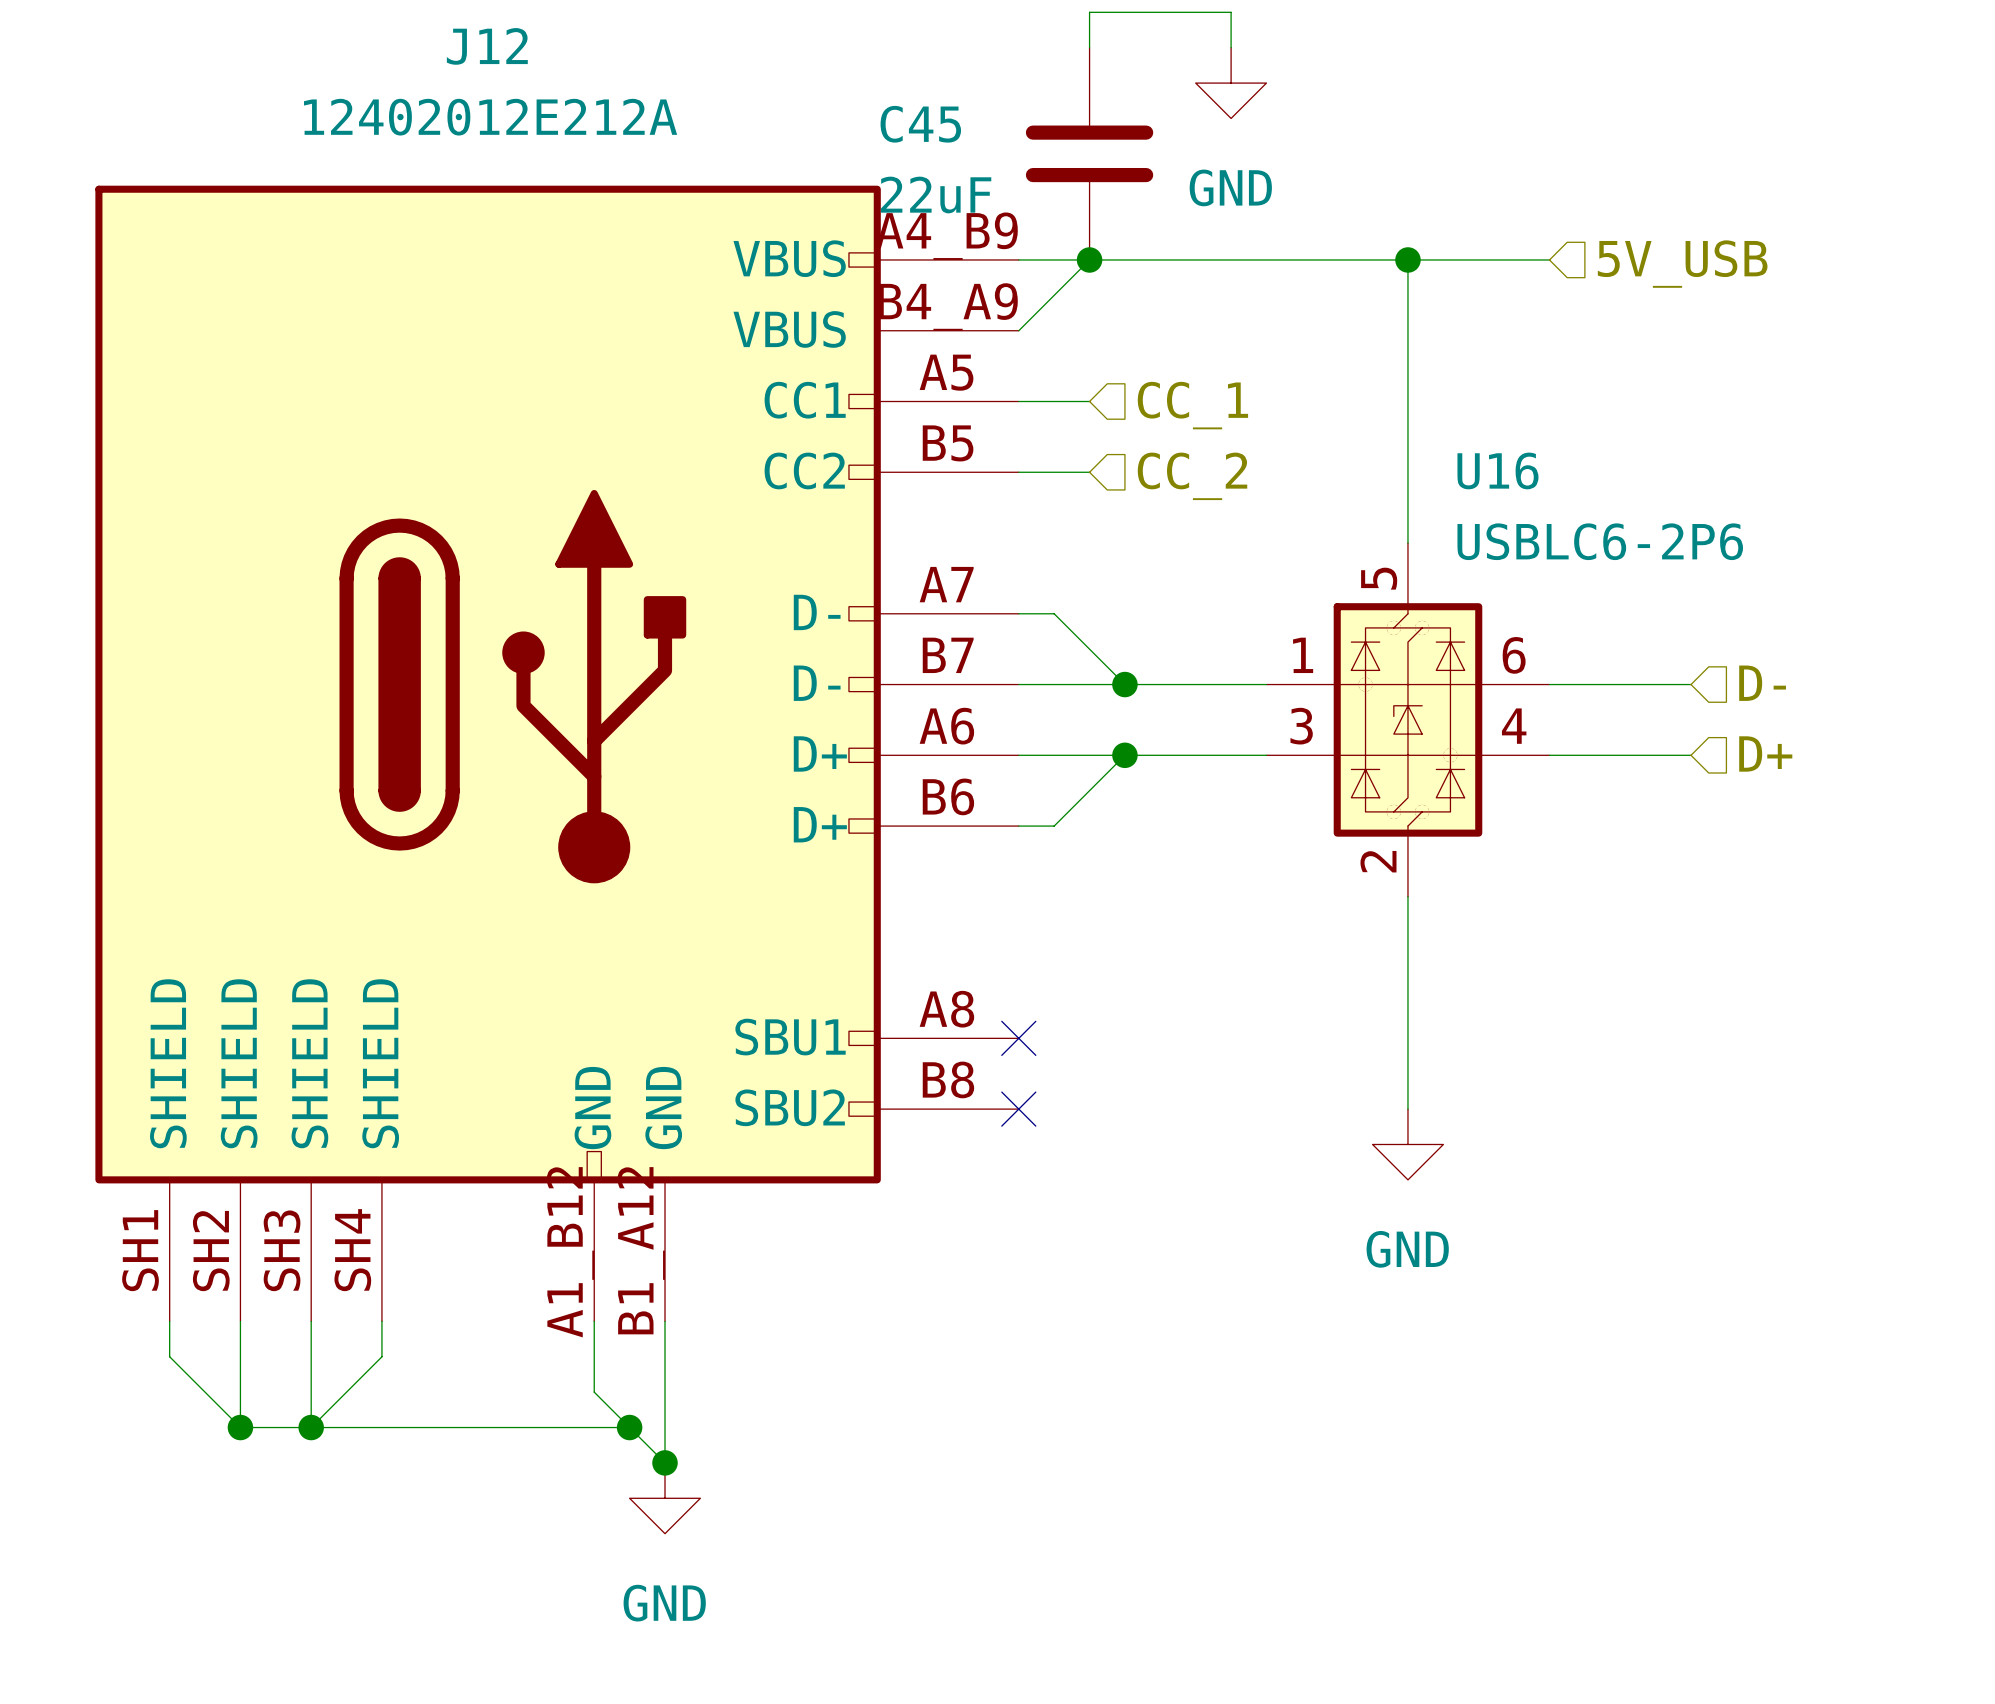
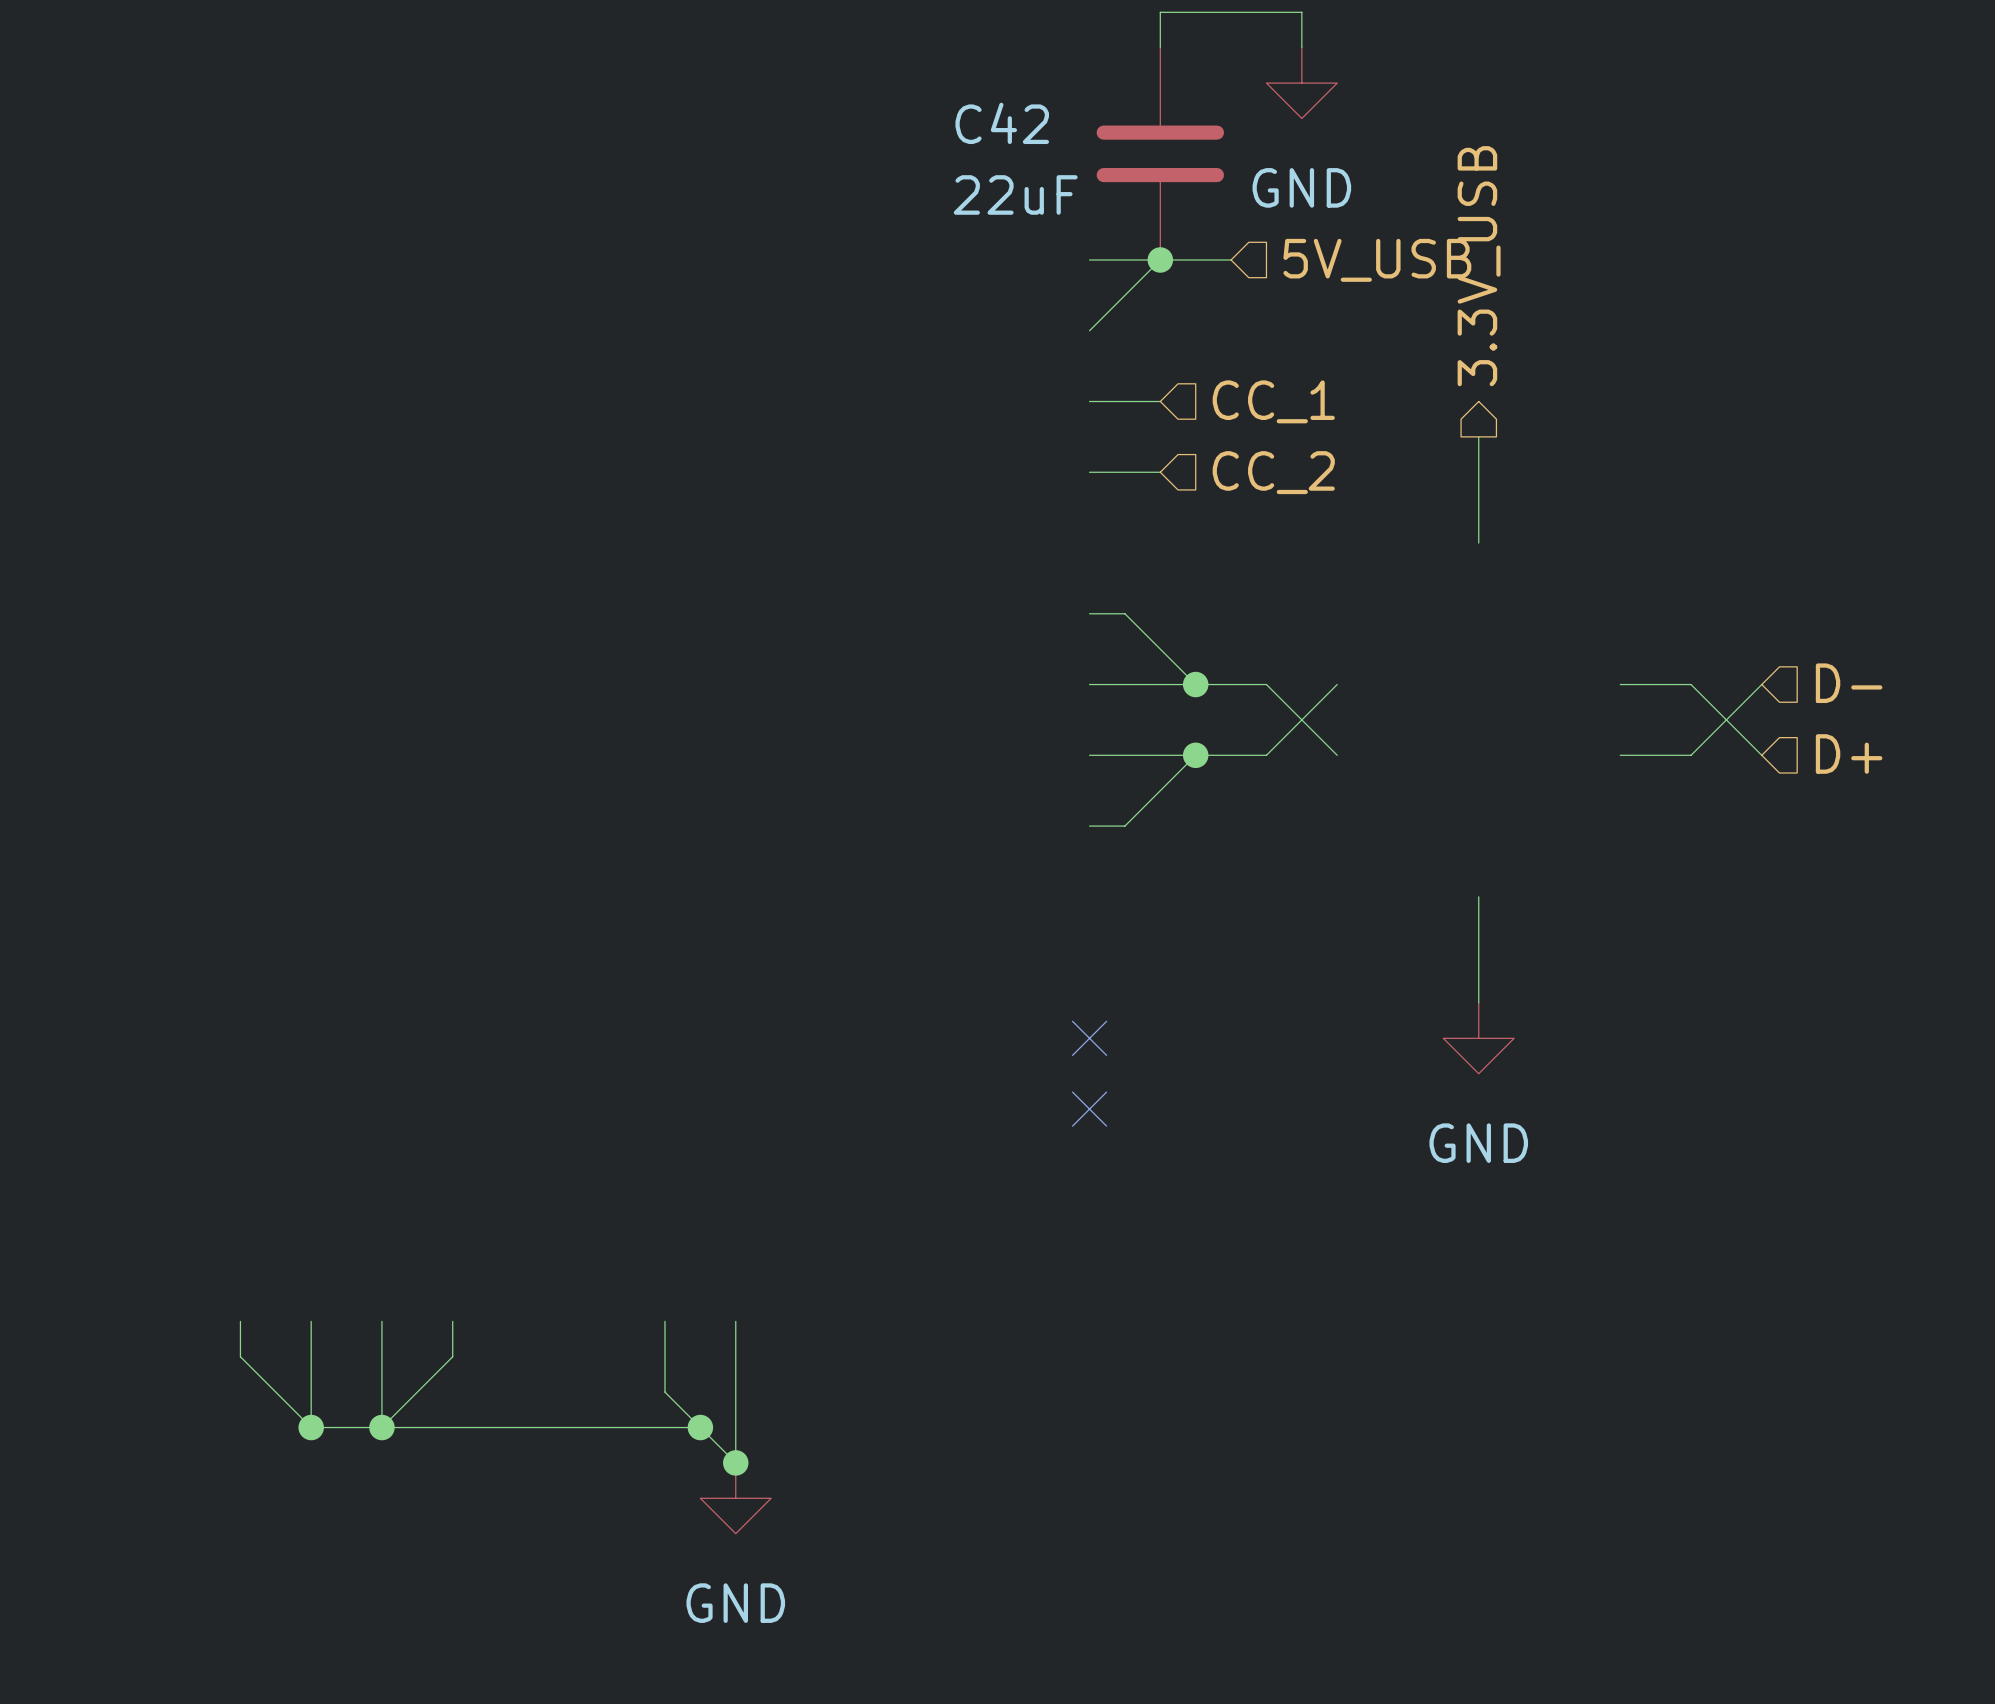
wire: (1160, 12) (1089, 12) (1089, 47) -> (1160, 12) (1160, 47)
wire: (1231, 12) (1231, 47) -> (1231, 12) (1301, 12) (1301, 47)
power symbol position: GND (1231, 83) -> GND (1301, 83)
C45: 22uF (1089, 153) -> none
C42: none -> 22uF (1160, 153)
wire: (1018, 259) (1089, 259) (1018, 330) -> none
junction position: (1089, 259) -> (1160, 259)
wire: none -> (1160, 259) (1089, 330)
wire: (1231, 259) (1549, 259) -> none
wire: (1407, 259) (1407, 543) -> none
junction: (1407, 259) -> none
hierarchical label position: 5V_USB (1682, 264) -> 5V_USB (1377, 260)
hierarchical label: none -> 3.3V_USB (1479, 266)
wire: (1018, 401) (1089, 401) -> (1160, 401) (1089, 401)
hierarchical label position: CC_1 (1192, 405) -> CC_1 (1273, 401)
wire: none -> (1478, 436) (1478, 543)
wire: (1018, 472) (1089, 472) -> (1160, 472) (1089, 472)
hierarchical label position: CC_2 (1192, 476) -> CC_2 (1273, 472)
wire: (1018, 613) (1054, 613) (1124, 684) -> (1089, 613) (1124, 613) (1195, 684)
hierarchical label position: D- (1762, 683) -> D- (1849, 683)
wire: (1018, 684) (1089, 684) -> none
junction: (1124, 684) -> none
junction: none -> (1195, 684)
wire: none -> (1266, 684) (1337, 755)
wire: none -> (1337, 684) (1266, 755)
wire: (1549, 684) (1620, 684) -> none
wire: none -> (1691, 684) (1761, 755)
wire: none -> (1761, 684) (1691, 755)
U16: USBLC6-2P6 (1407, 719) -> none
J12: 12402012E212A (557, 753) -> none
hierarchical label position: D+ (1765, 753) -> D+ (1849, 753)
wire: (1018, 755) (1089, 755) -> none
wire: (1124, 755) (1054, 826) (1018, 826) -> (1195, 755) (1124, 826) (1089, 826)
junction: (1124, 755) -> none
junction: none -> (1195, 755)
wire: (1549, 755) (1620, 755) -> none
wire: (1407, 896) (1407, 1109) -> none
wire: none -> (1478, 896) (1478, 1002)
no-connect mark: (1018, 1038) -> none
no-connect mark: none -> (1089, 1038)
no-connect mark: (1018, 1109) -> none
no-connect mark: none -> (1089, 1109)
power symbol position: GND (1407, 1144) -> GND (1478, 1038)
wire: (169, 1321) (169, 1356) (240, 1427) -> none
wire: (594, 1321) (594, 1392) (665, 1462) (665, 1392) -> (735, 1321) (735, 1462) (665, 1392)
wire: (240, 1356) (240, 1427) -> (240, 1356) (311, 1427)
wire: (381, 1356) (311, 1427) (240, 1427) -> (381, 1356) (381, 1427) (452, 1356) (452, 1321)
junction: (240, 1427) -> none
junction: none -> (381, 1427)
wire: none -> (629, 1427) (700, 1427)
junction: (629, 1427) -> none
junction: none -> (700, 1427)
junction: (665, 1462) -> none
junction: none -> (735, 1462)
power symbol position: GND (665, 1498) -> GND (735, 1498)

